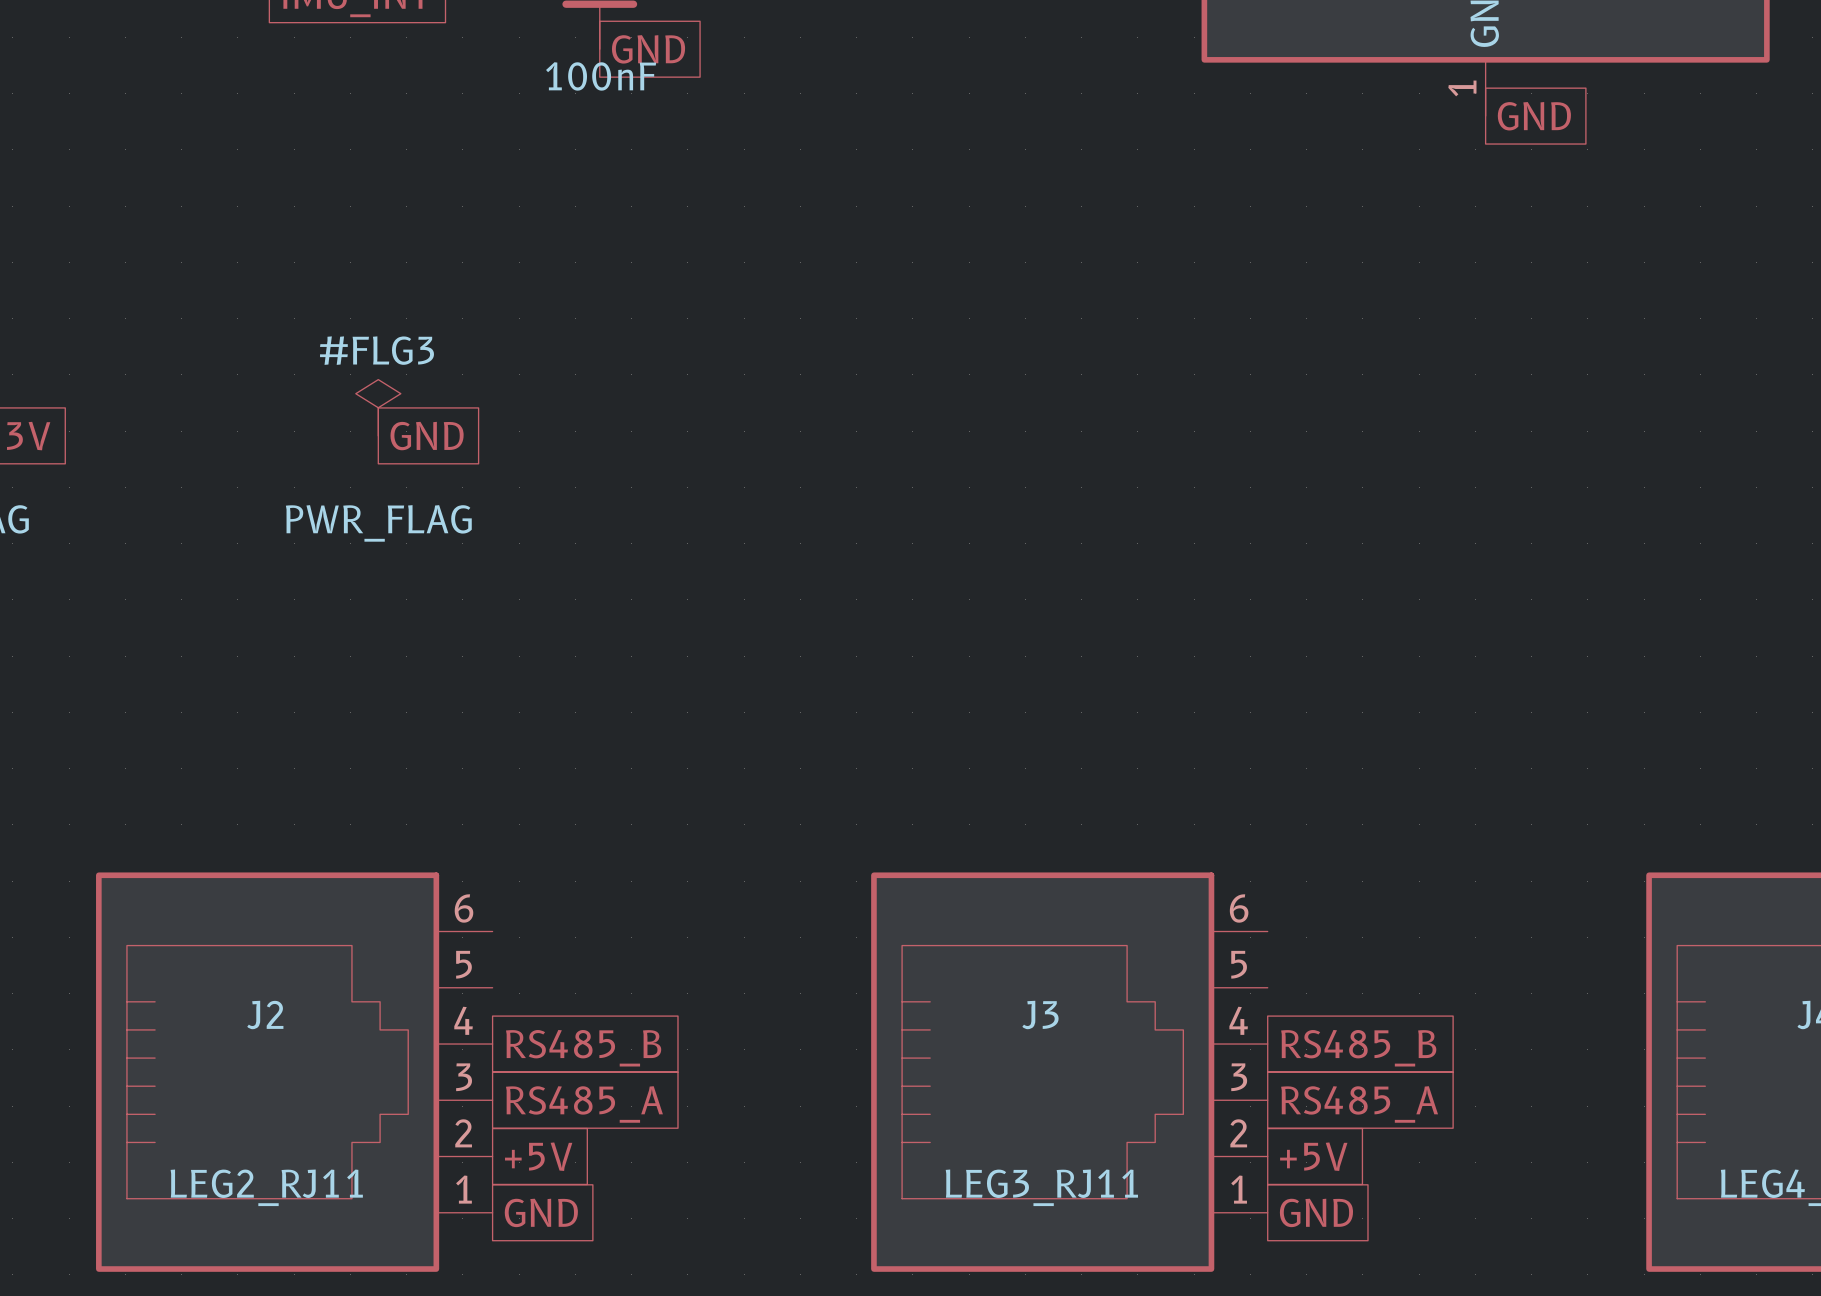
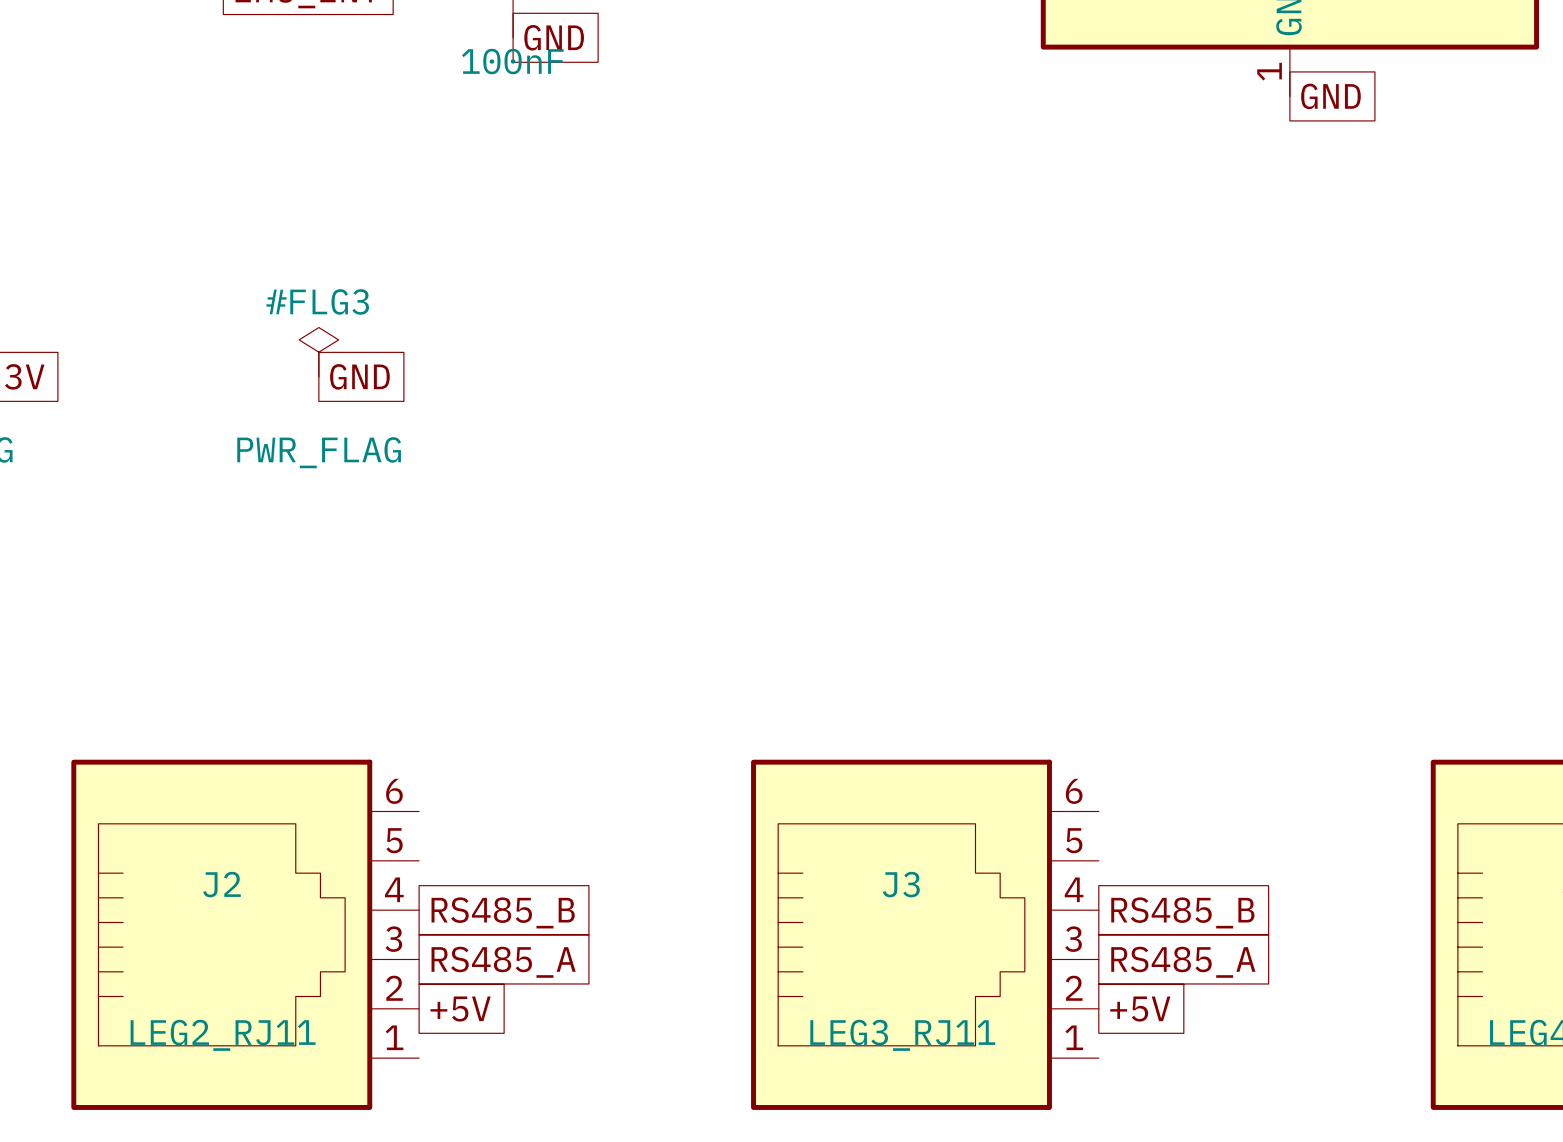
global label: GND (541, 1212) -> none
global label: GND (1316, 1212) -> none

